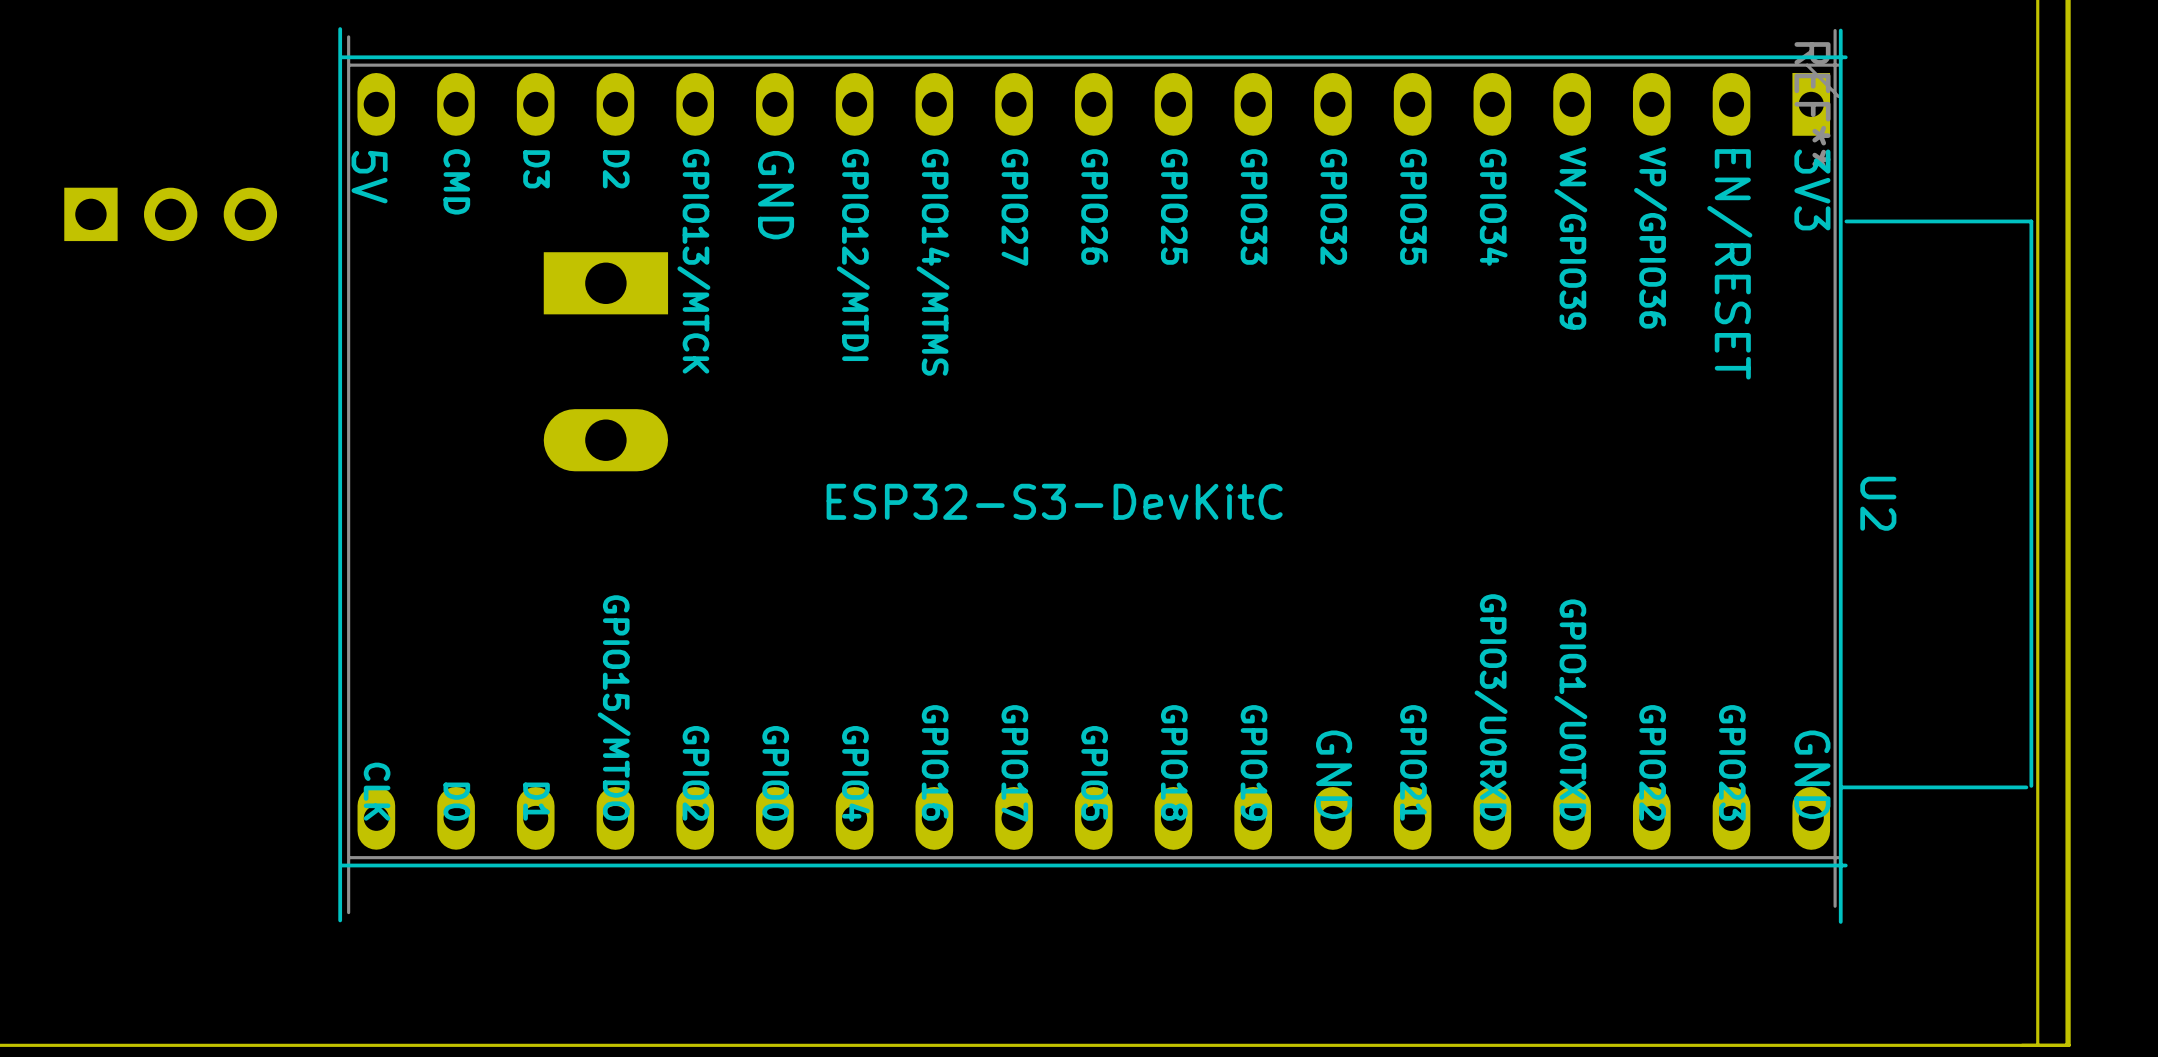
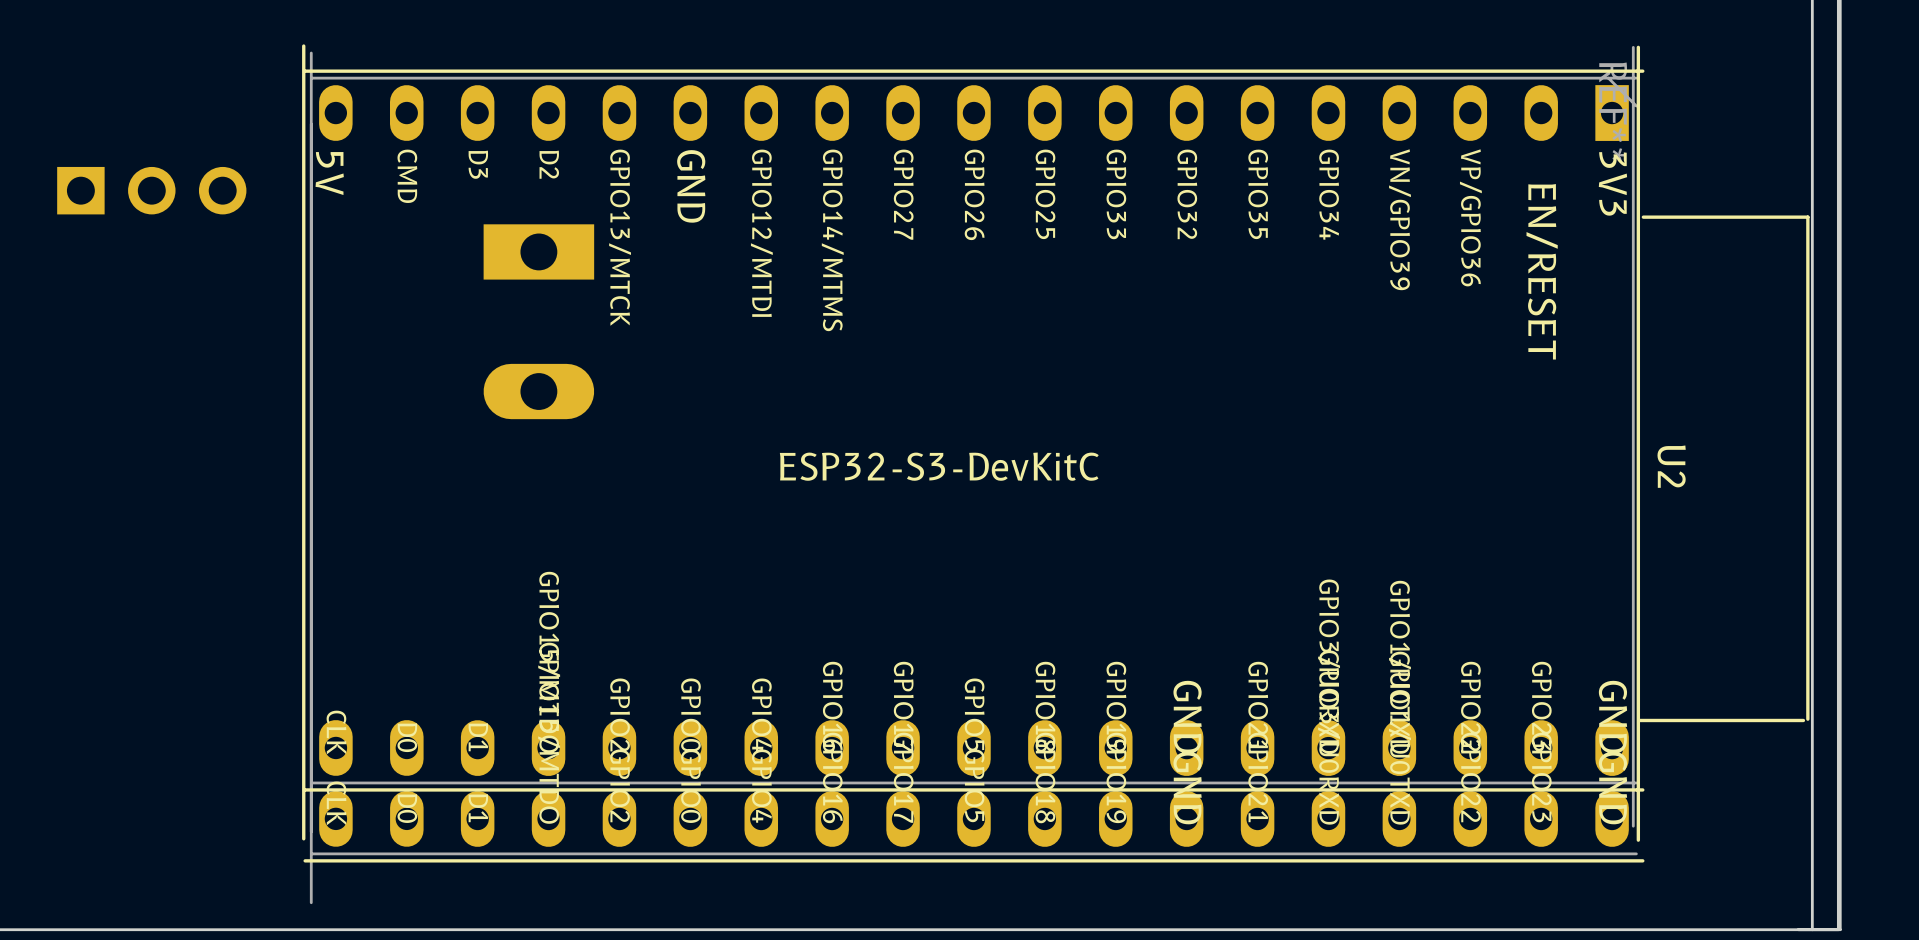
U2 footprint: [338, 27, 2034, 924] -> [302, 44, 1810, 905]

